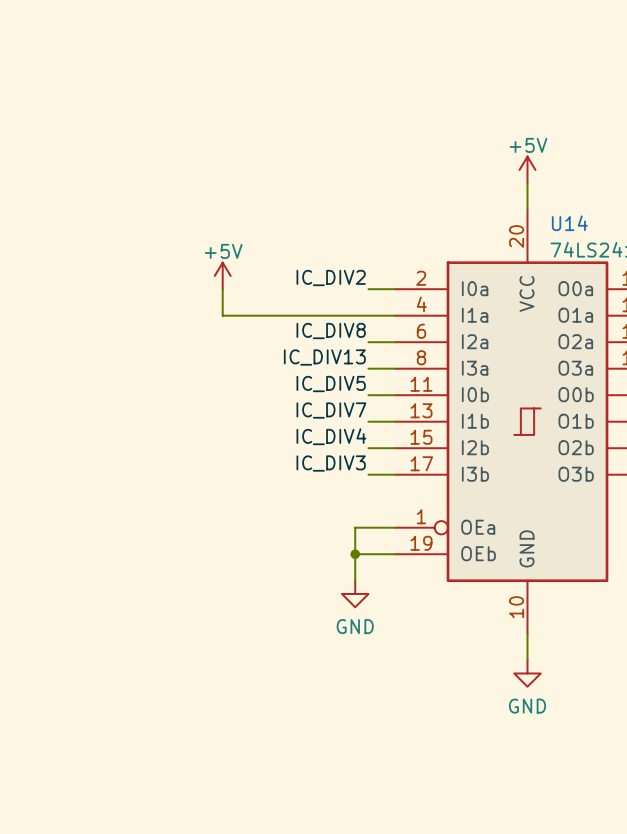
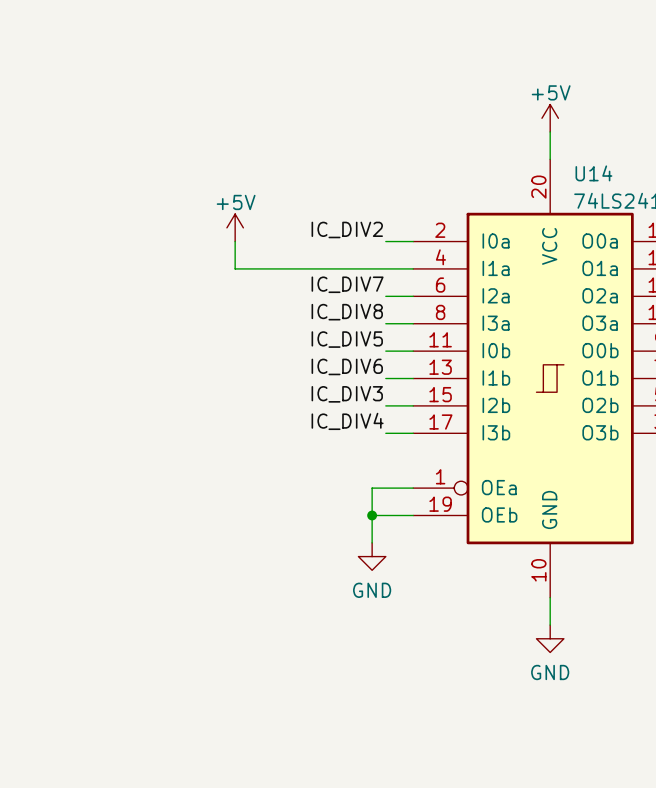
label: IC_DIV8 (331, 331) -> IC_DIV7 (347, 284)
label: IC_DIV13 (324, 357) -> IC_DIV8 (347, 312)
label: IC_DIV7 (331, 410) -> IC_DIV6 (347, 366)
label: IC_DIV4 (331, 436) -> IC_DIV3 (347, 394)
label: IC_DIV3 (331, 463) -> IC_DIV4 (347, 421)

